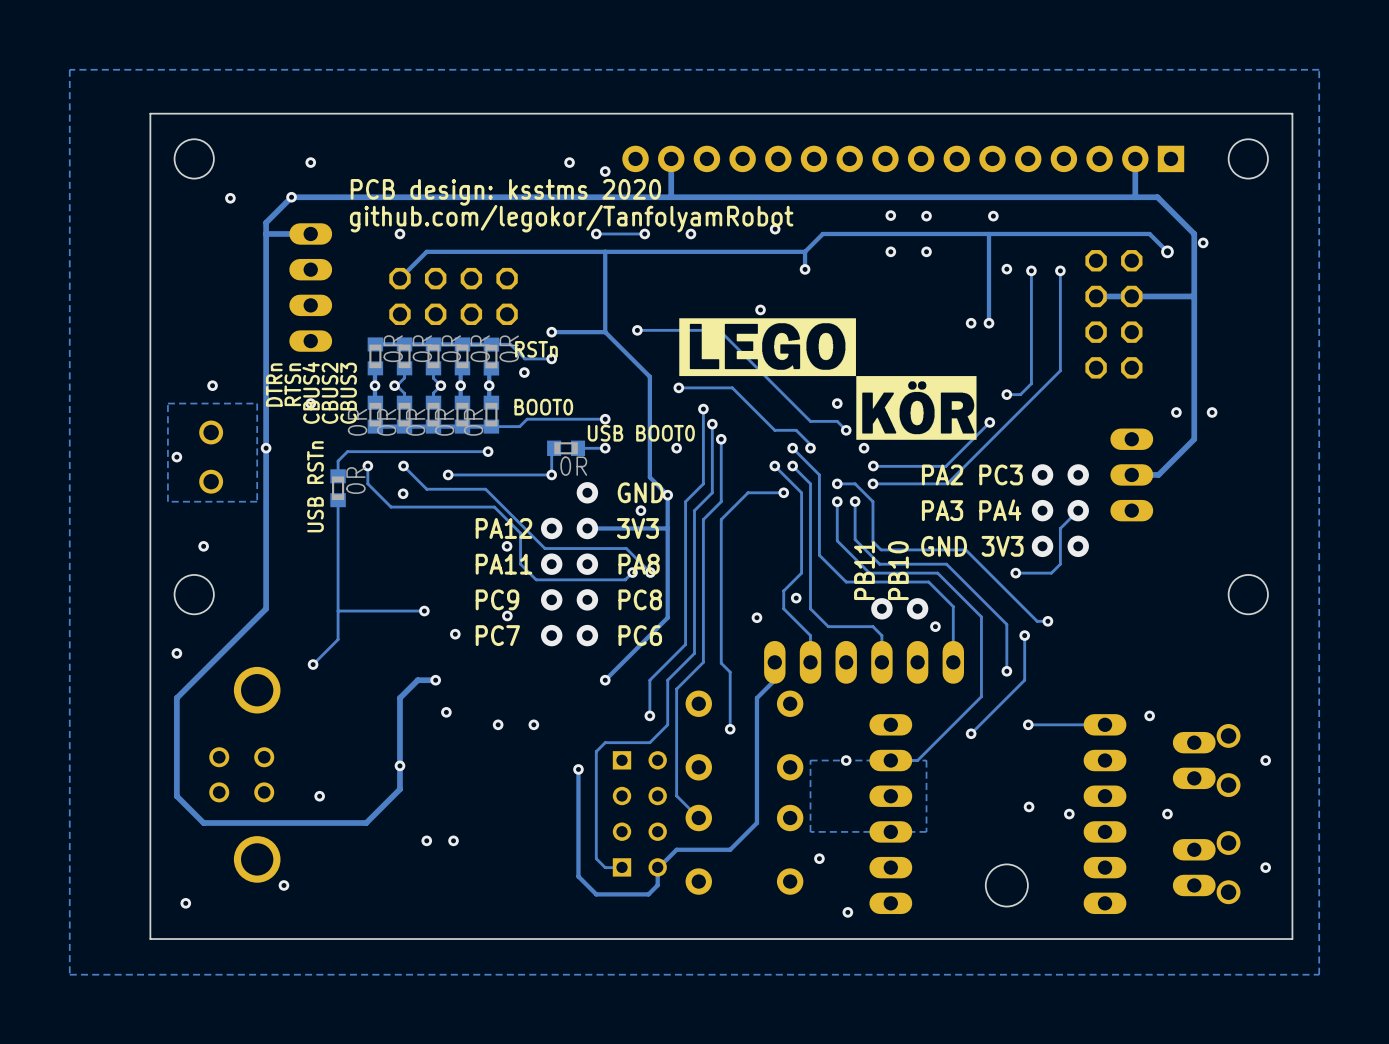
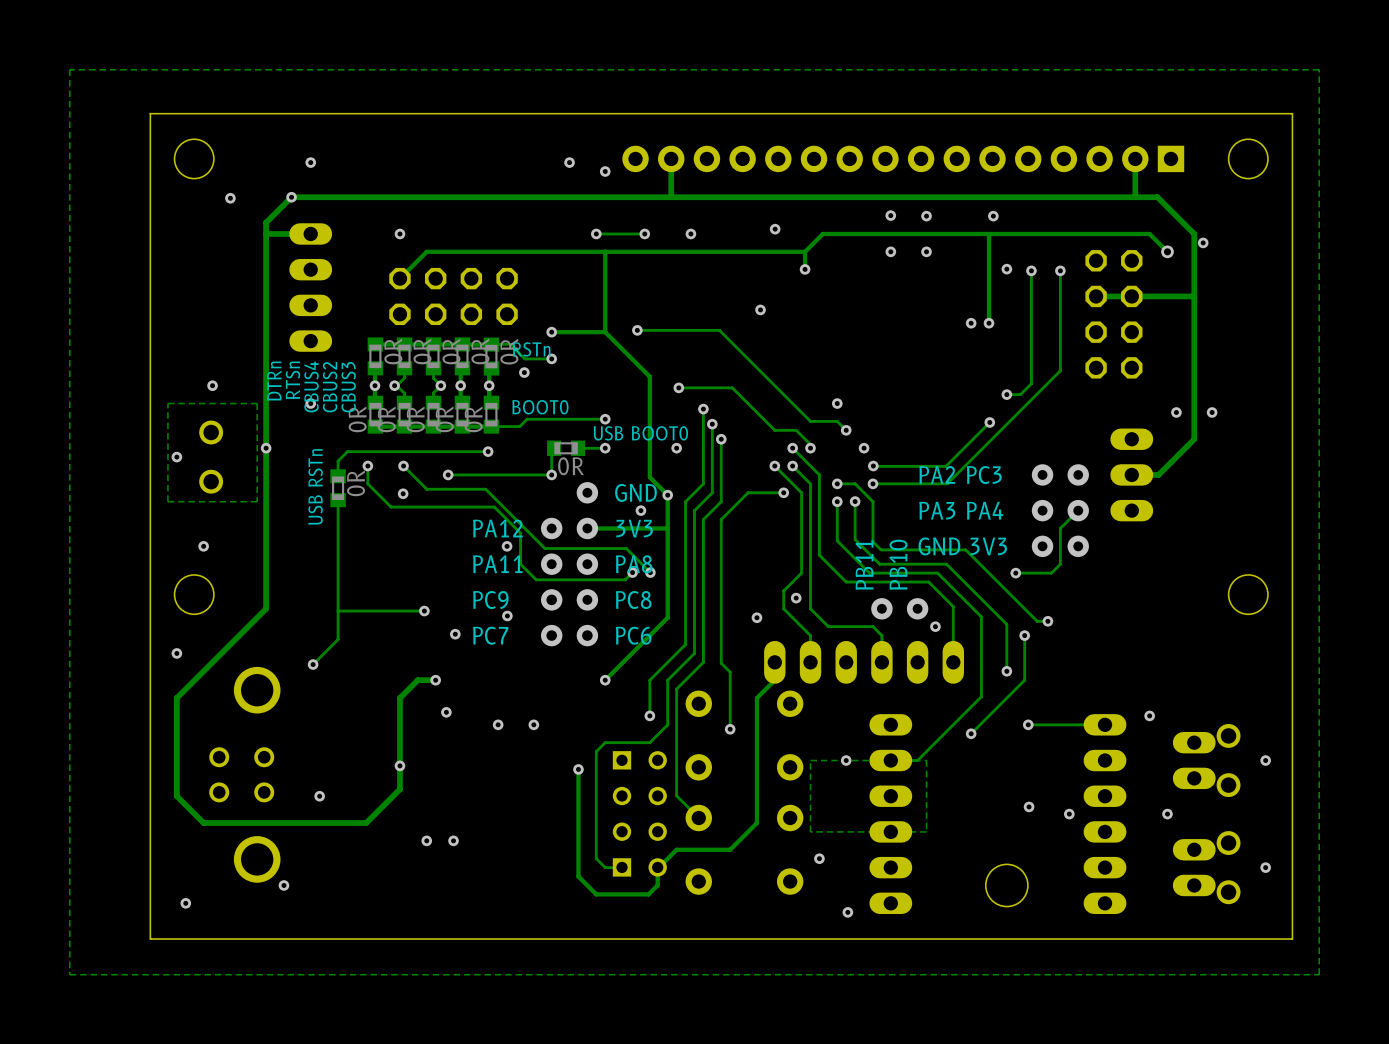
text: PCB design: ksstms 2020 (505, 192) -> none
text: github.com/legokor/TanfolyamRobot (571, 218) -> none
drawing: [679, 318, 977, 440] -> none

